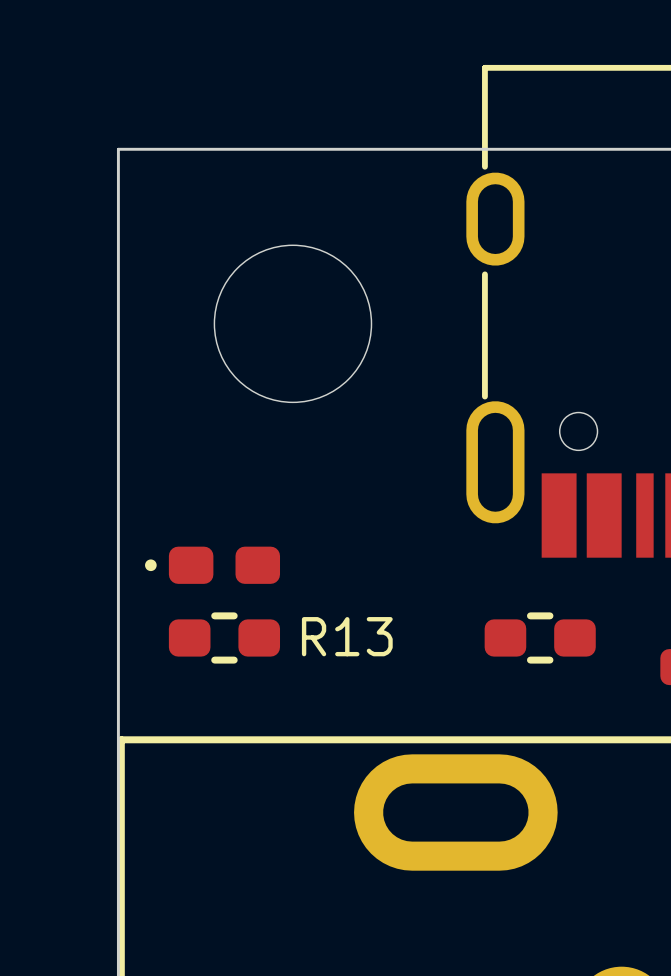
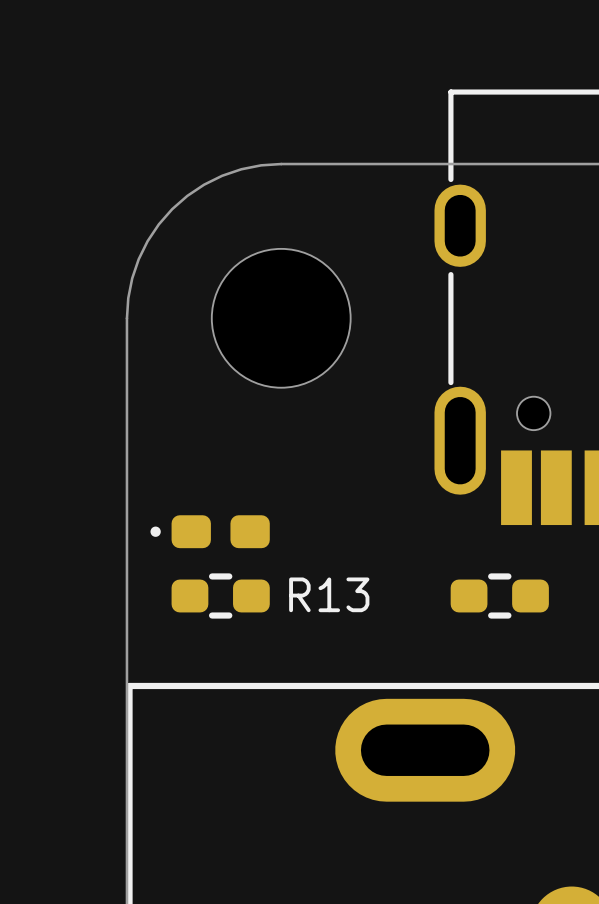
board edge: (292, 149) (118, 149) (118, 323) -> (281, 164) (241, 169) (222, 175) (187, 195) (172, 209) (158, 224) (138, 259) (132, 278) (126, 318)

